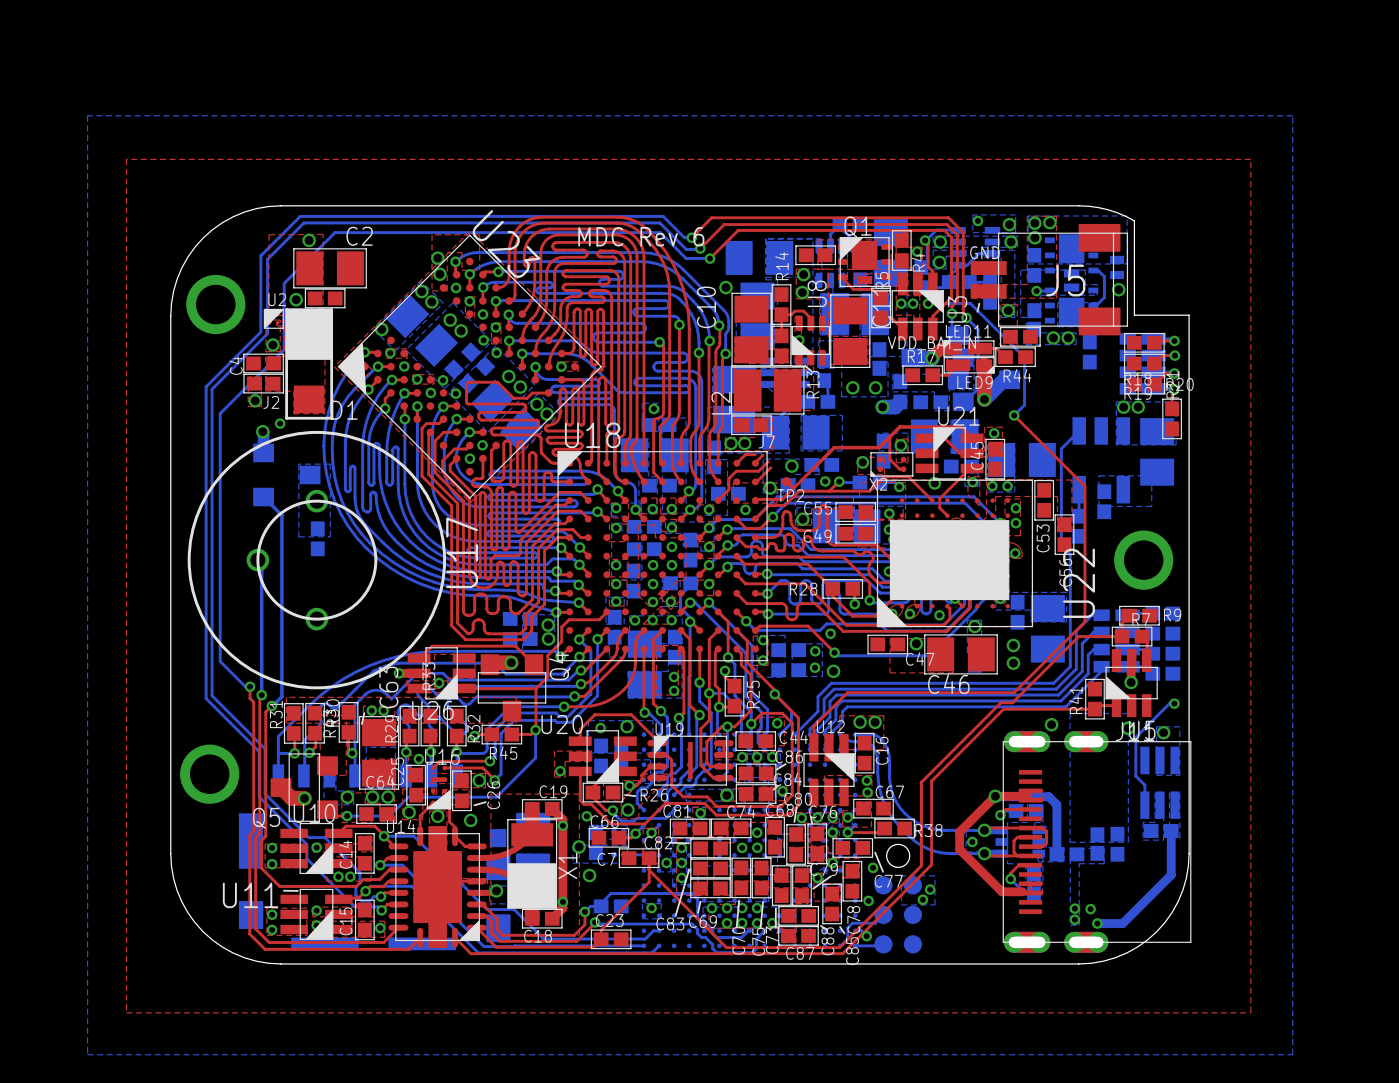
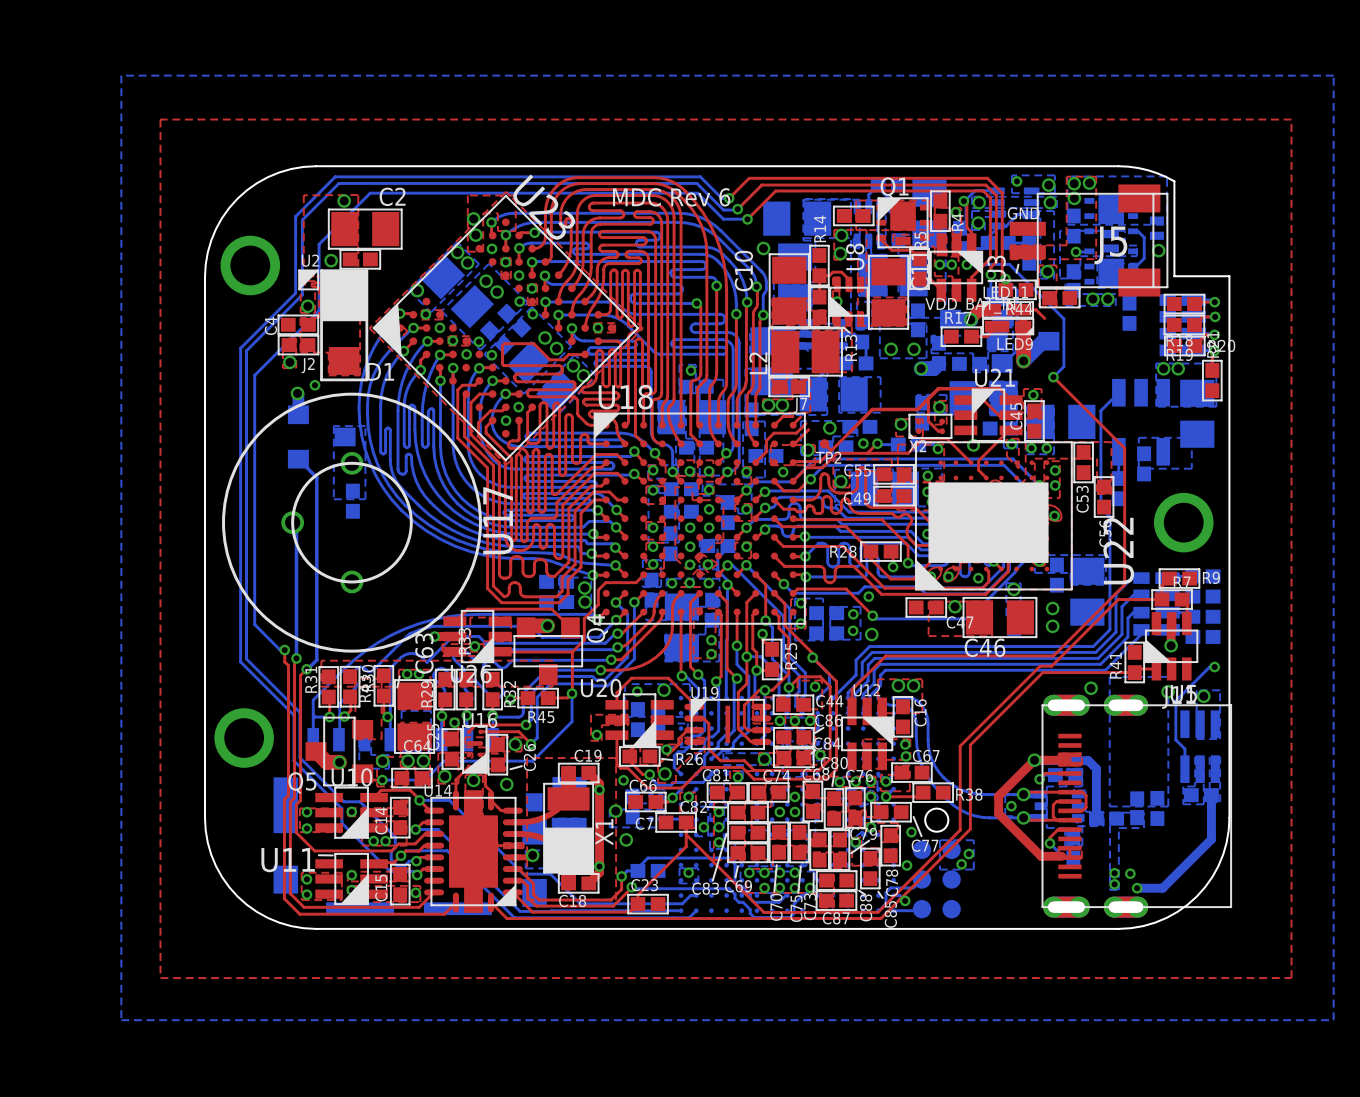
R44 position: (1015, 357) -> (1015, 289)

